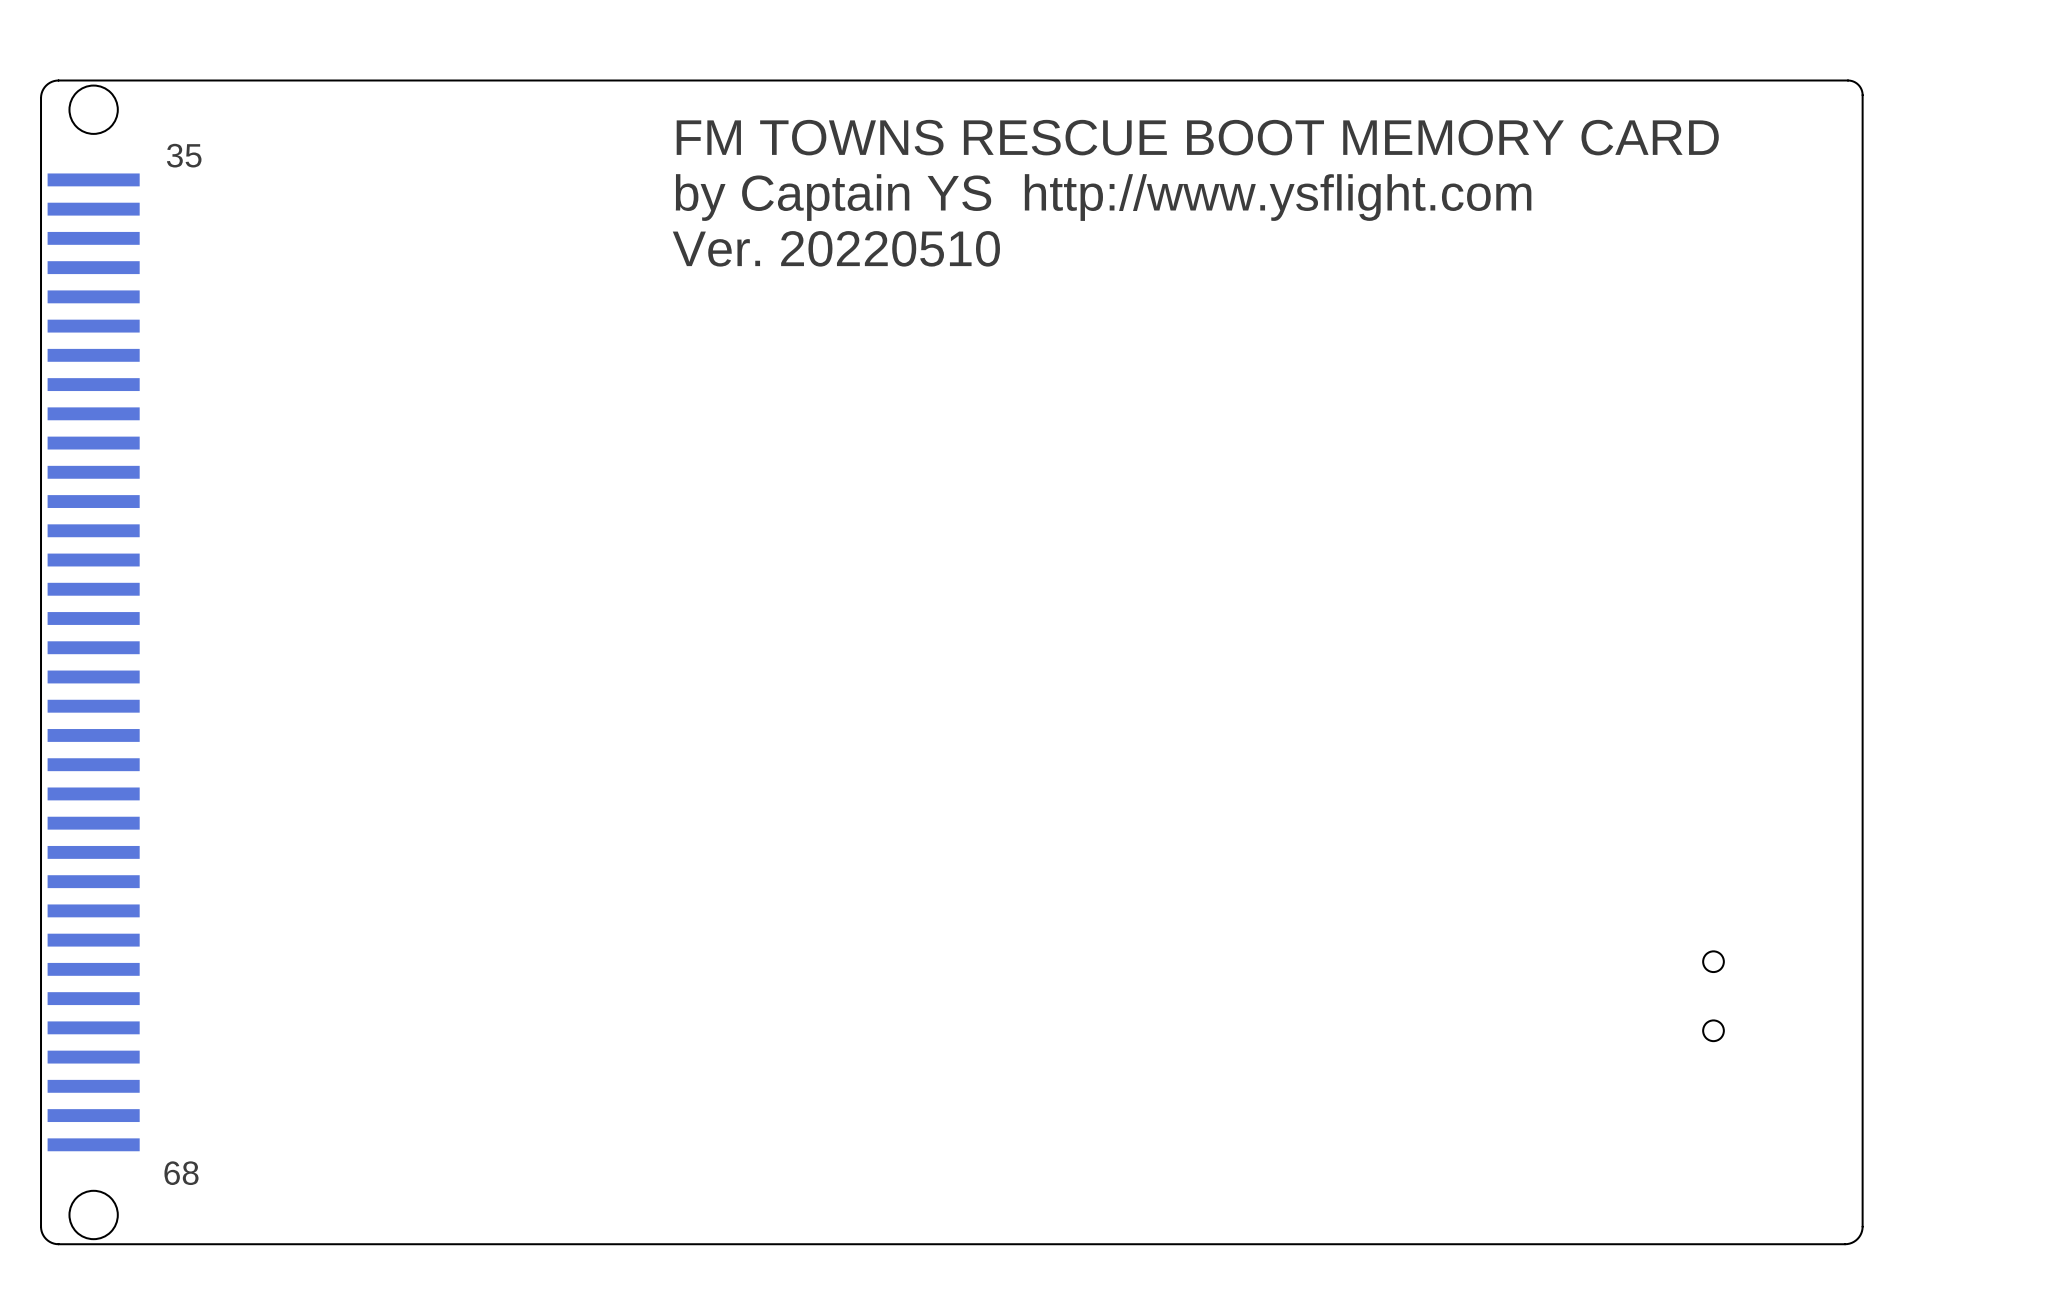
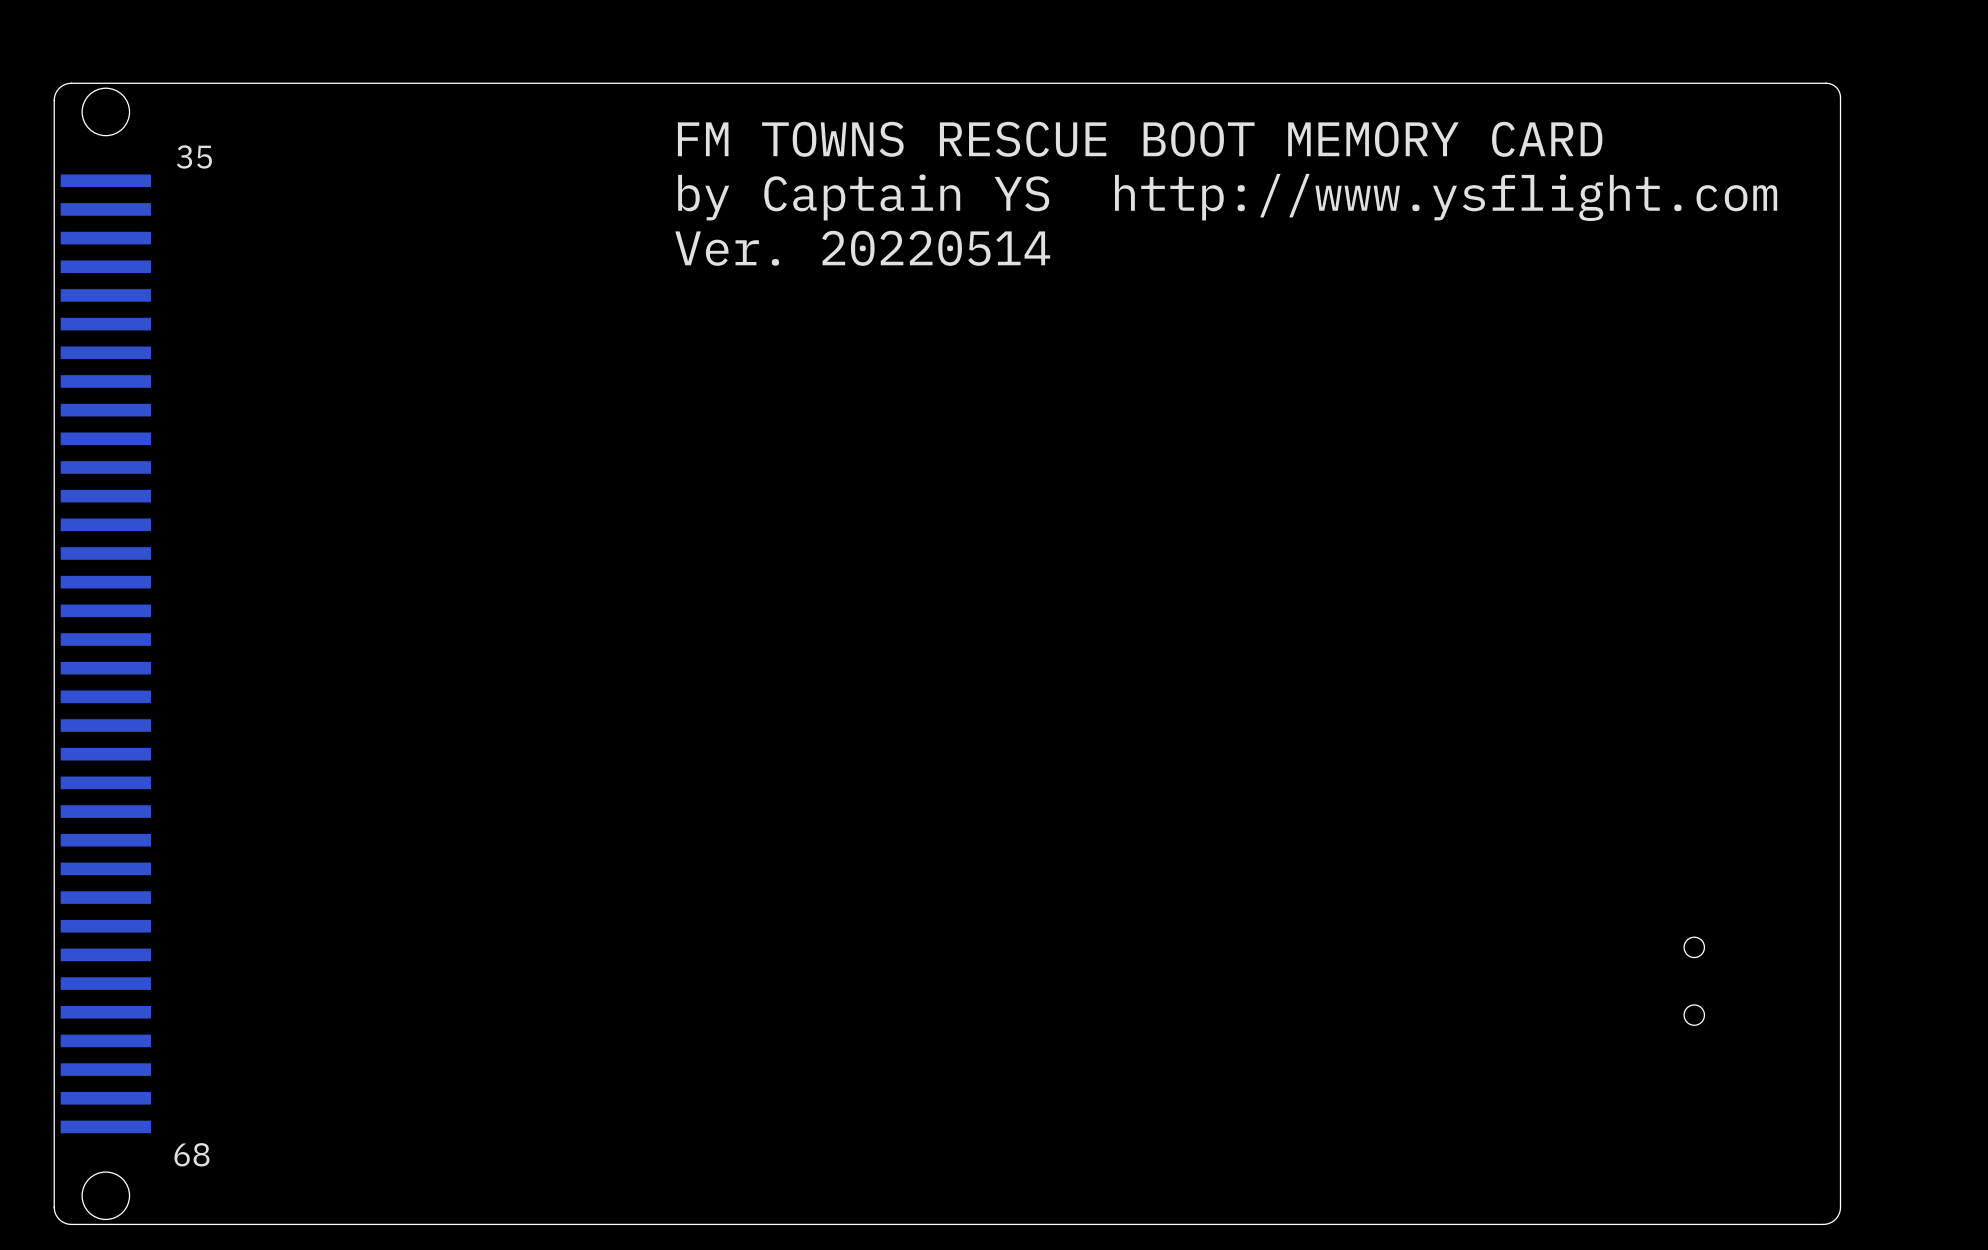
text: Ver. 20220510 (836, 248) -> Ver. 20220514 (862, 248)

